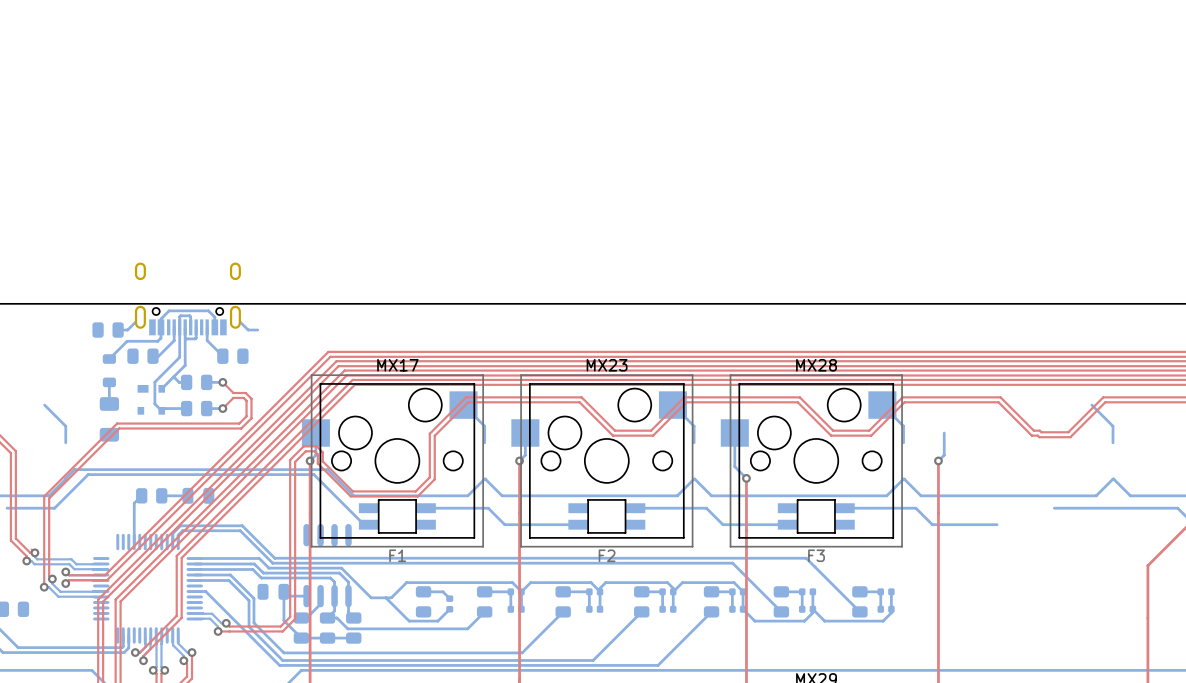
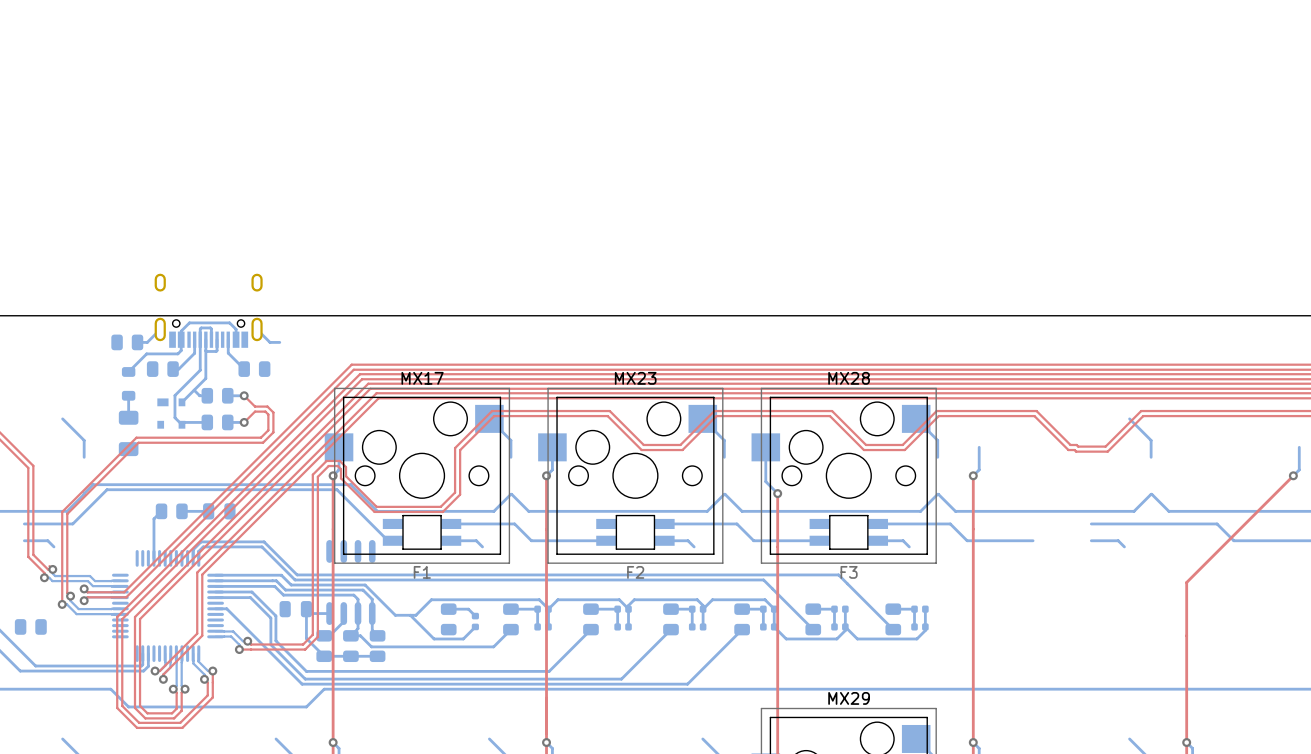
bottom track: none -> (24, 540) (47, 540) (53, 546)
bottom track: none -> (451, 540) (476, 540) (482, 546)
bottom track: none -> (664, 540) (688, 540) (694, 546)
bottom track: none -> (877, 540) (903, 540) (909, 546)
bottom track: none -> (1091, 540) (1118, 540) (1124, 546)

